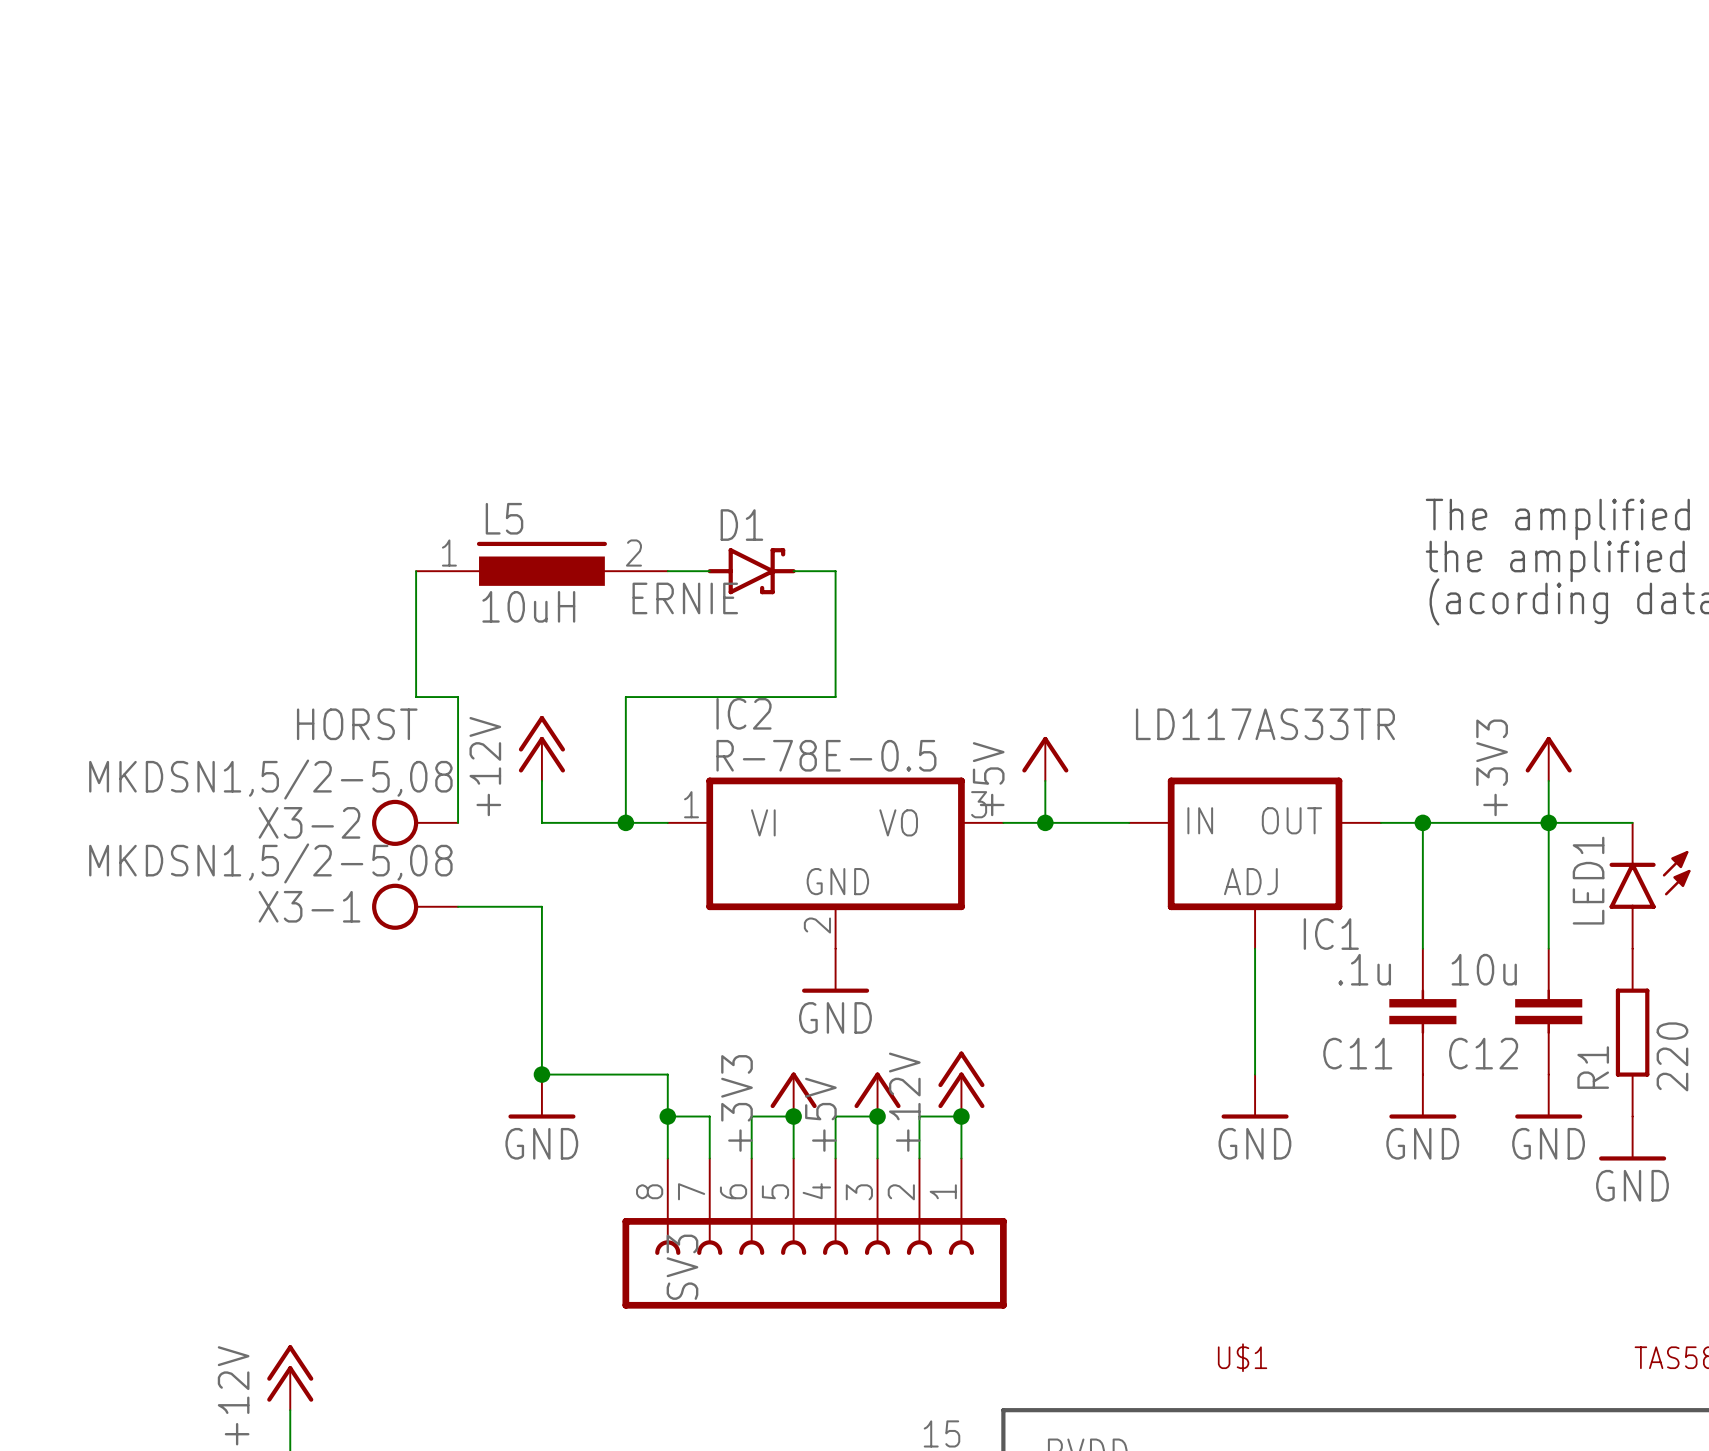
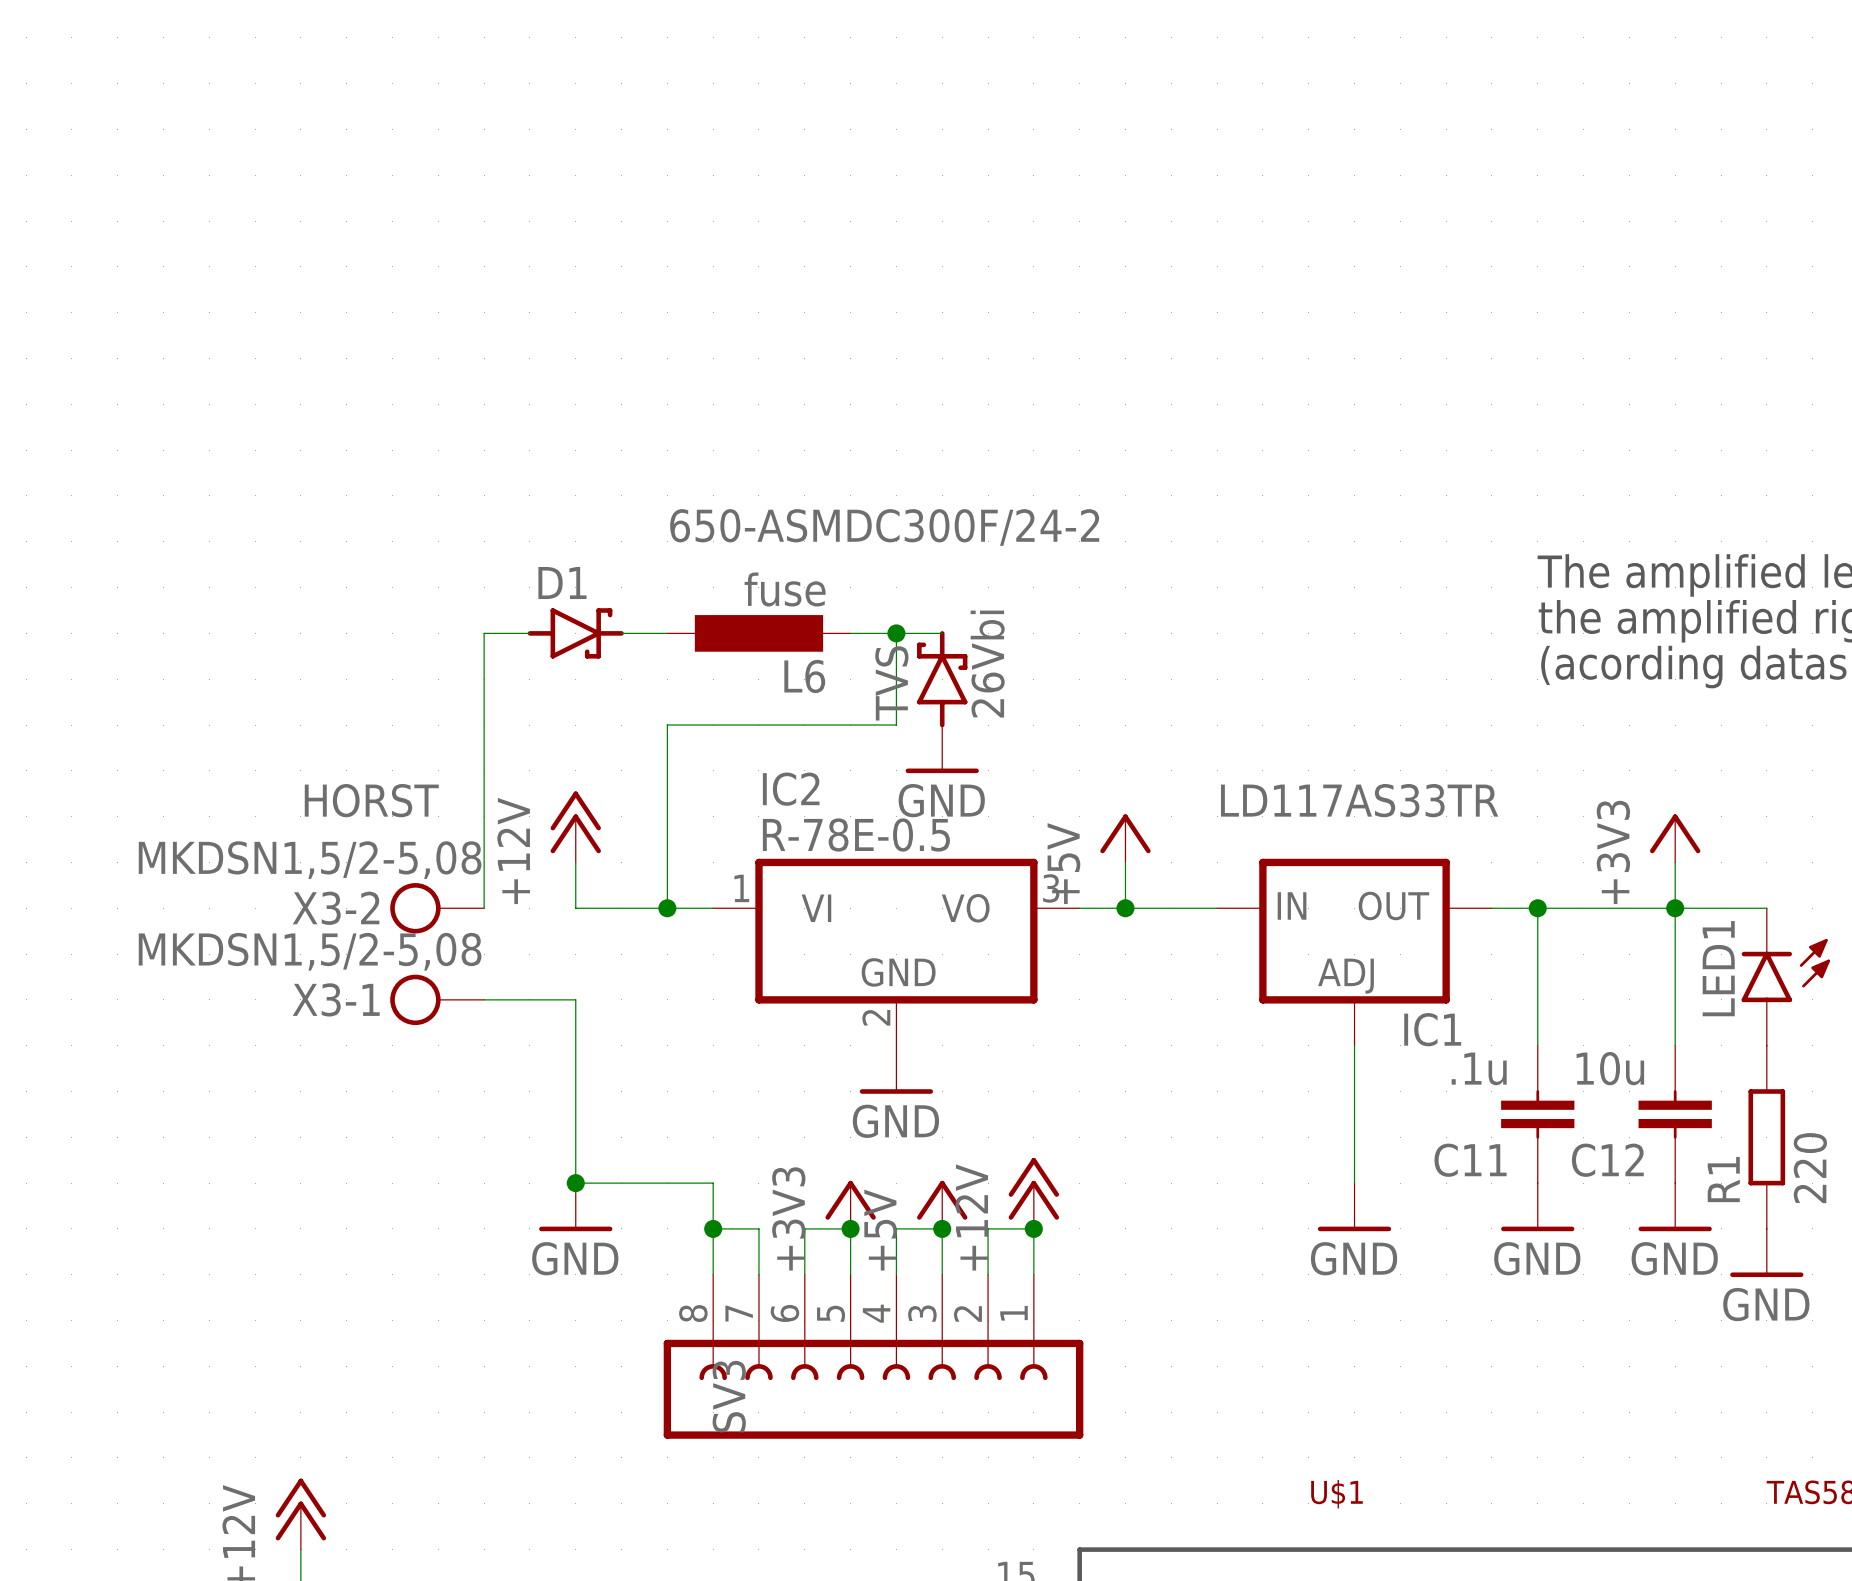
L5: 10uH (541, 563) -> none
wire: (416, 571) (416, 697) (458, 697) -> (529, 633) (484, 633) (484, 770)
L6: none -> fuse (758, 633)
D1 position: (751, 571) -> (575, 633)
wire: none -> (896, 633) (942, 633)
junction: none -> (896, 633)
label: ERNIE (685, 598) -> none
TVS: none -> 26Vbi (942, 679)
wire: (835, 655) (835, 697) (625, 697) -> (896, 725) (667, 725) (667, 770)
power symbol: none -> GND (942, 749)

